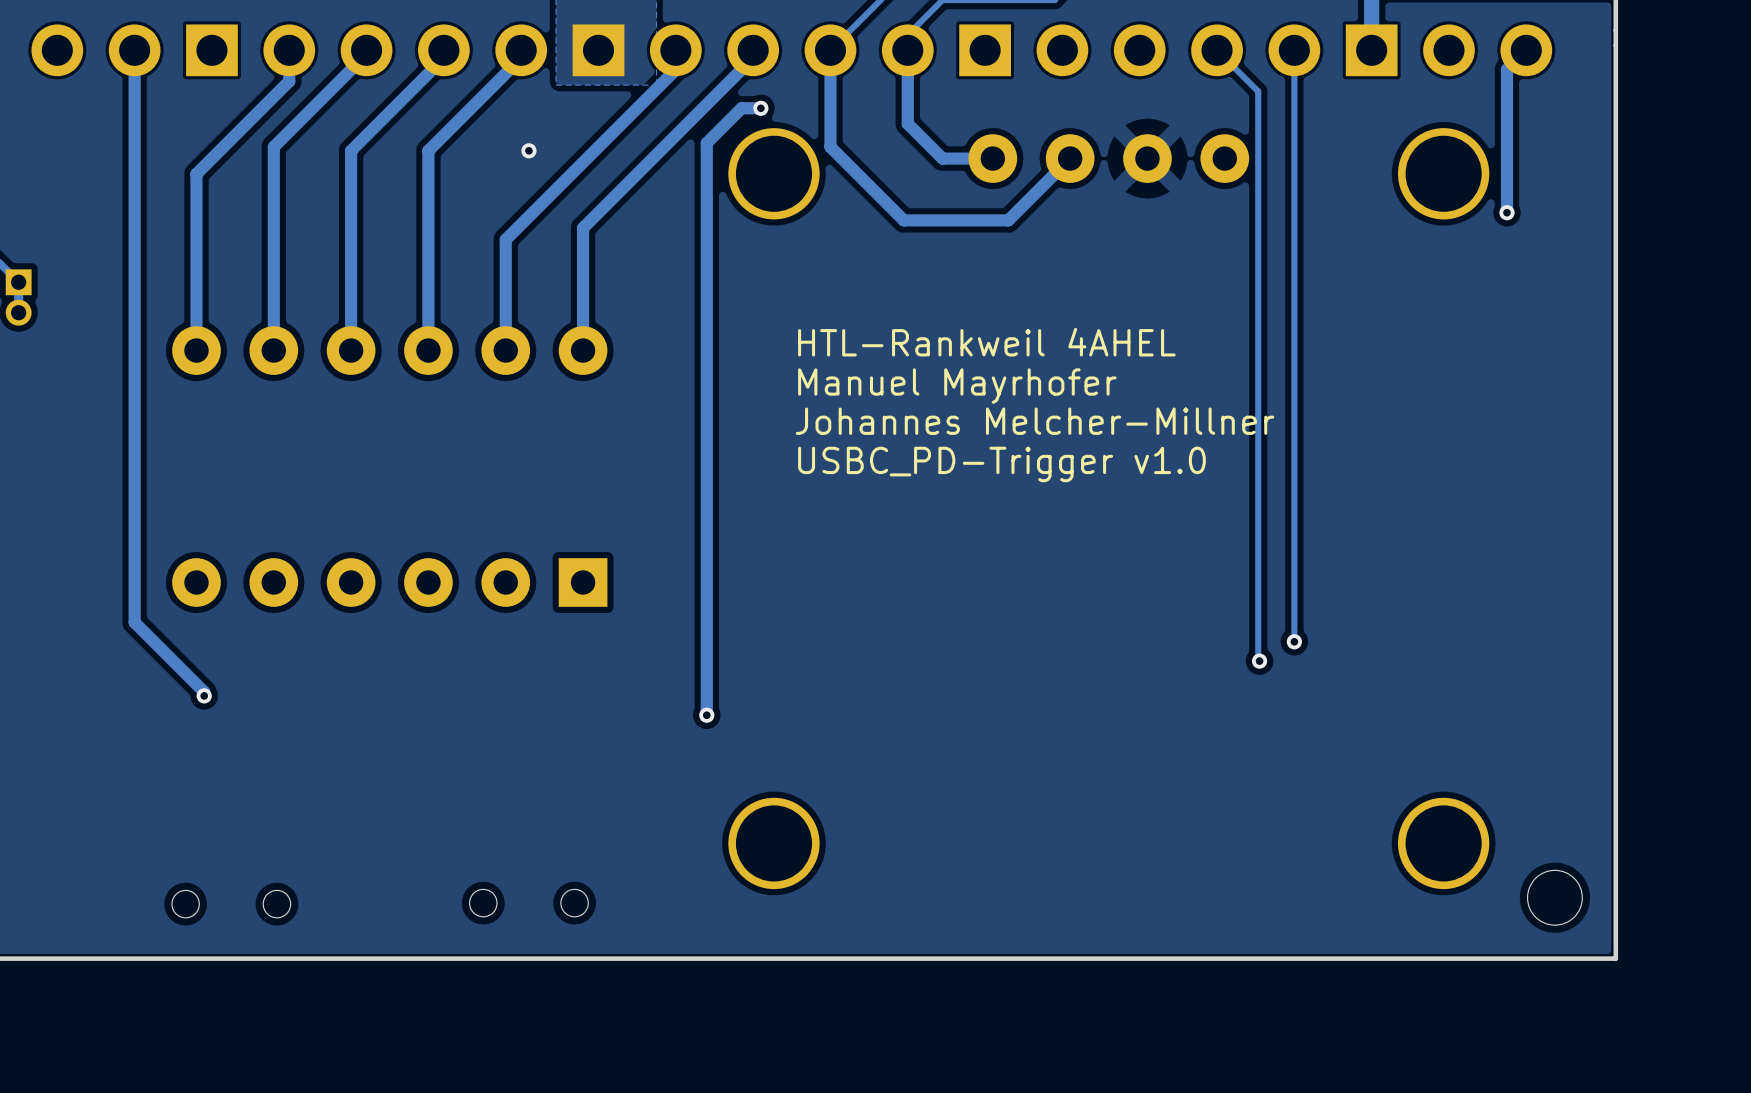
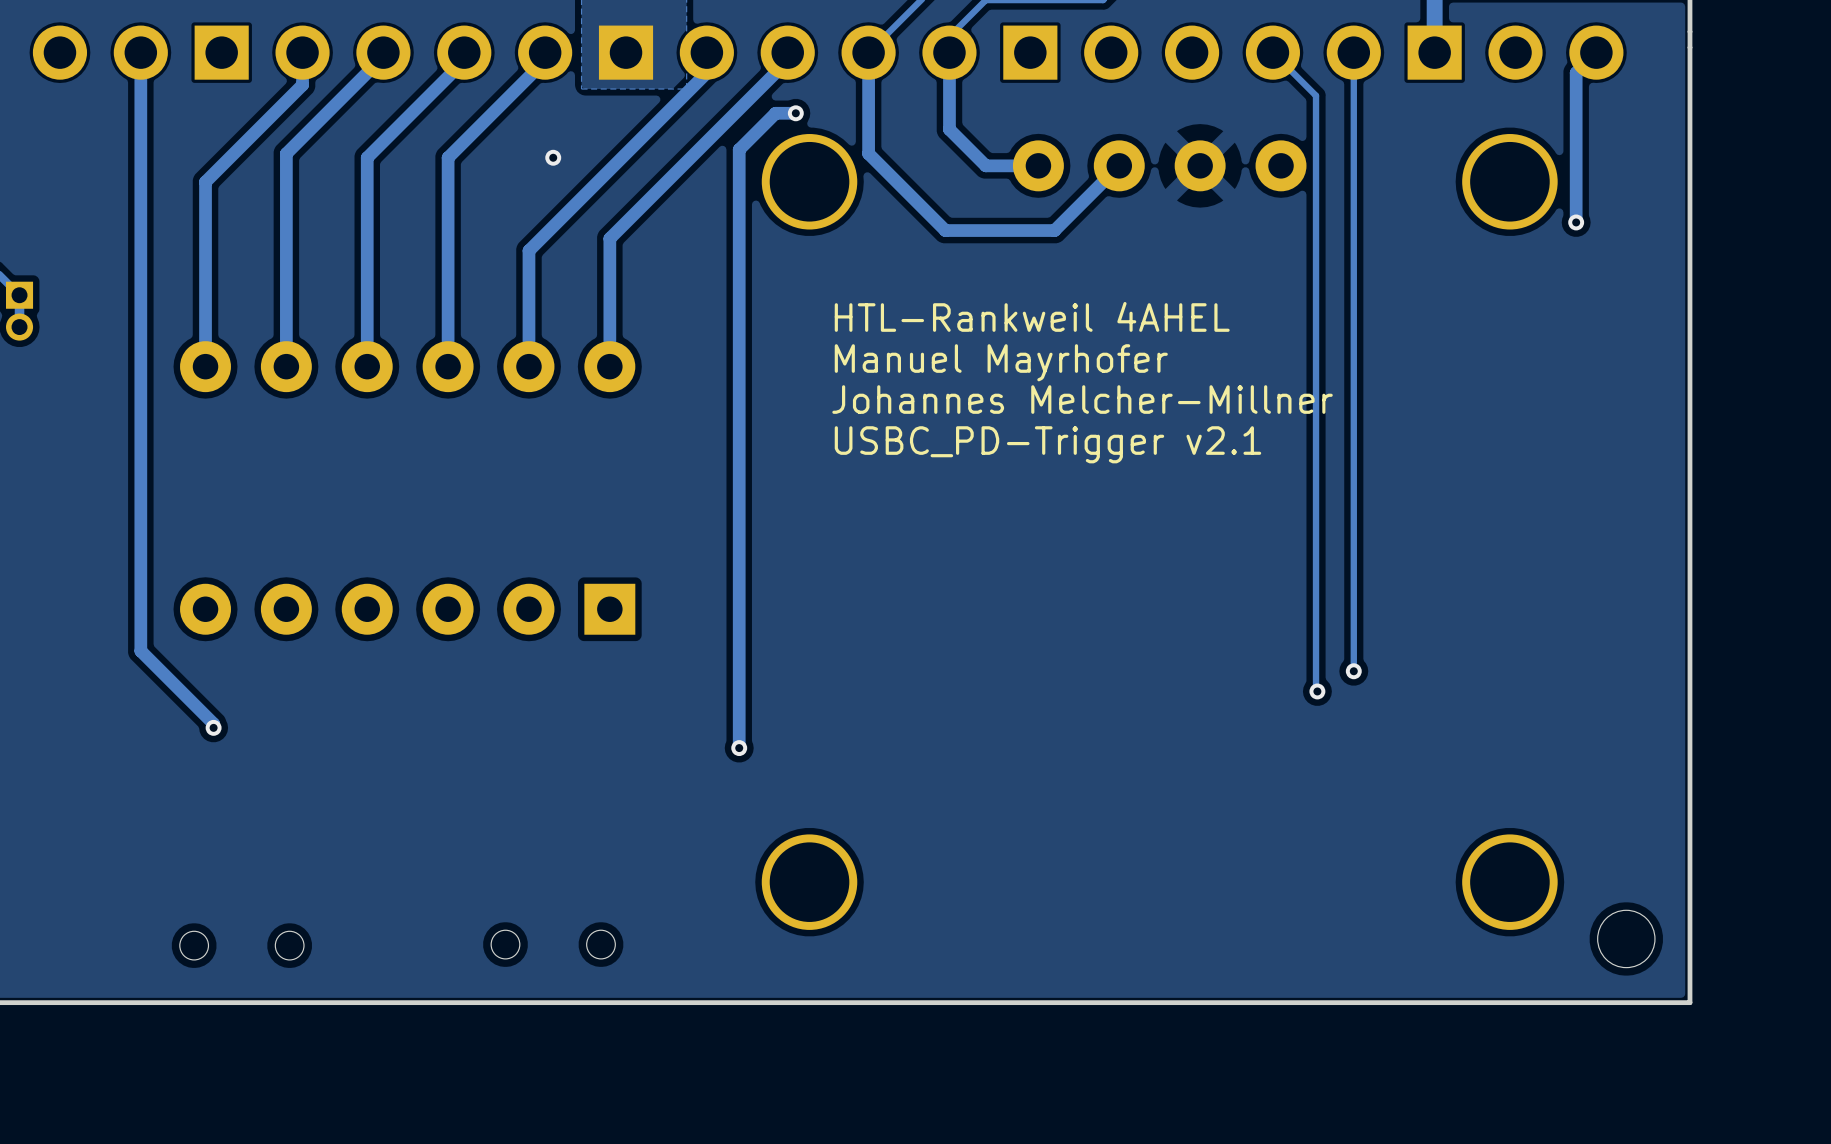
text: none -> HTL-Rankweil 4AHEL (1032, 316)
text: HTL-Rankweil 4AHEL (986, 342) -> Manuel Mayrhofer (1001, 362)
text: Manuel Mayrhofer (957, 386) -> Johannes Melcher-Millner (1082, 399)
text: Johannes Melcher-Millner (1035, 421) -> USBC_PD-Trigger v2.1 (1047, 444)
text: USBC_PD-Trigger v1.0 (1001, 464) -> none

